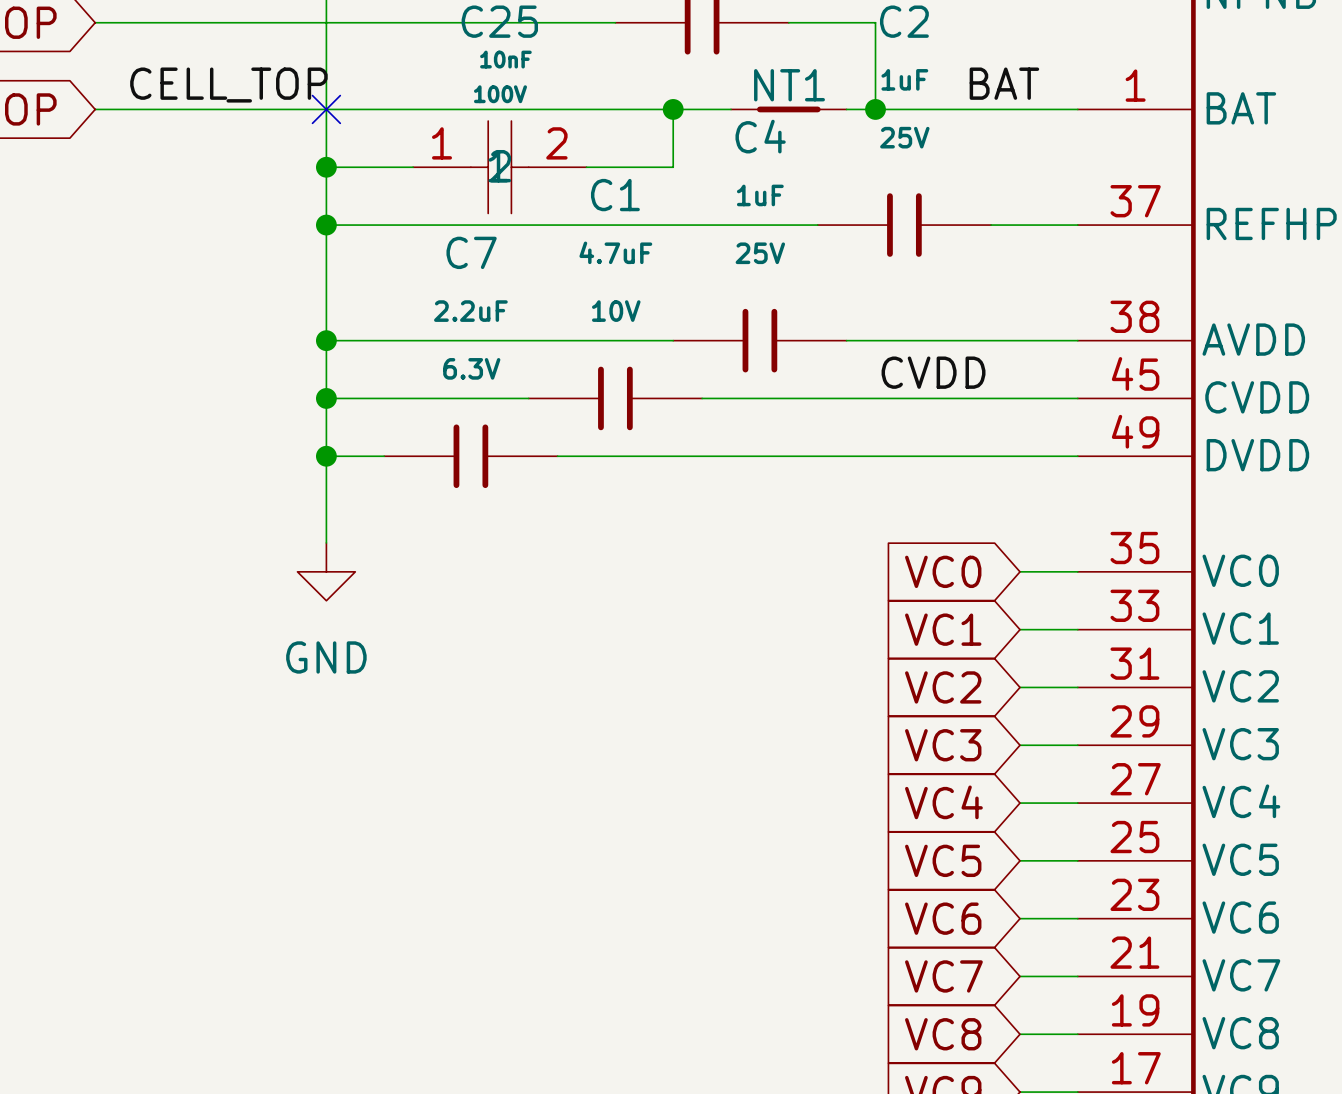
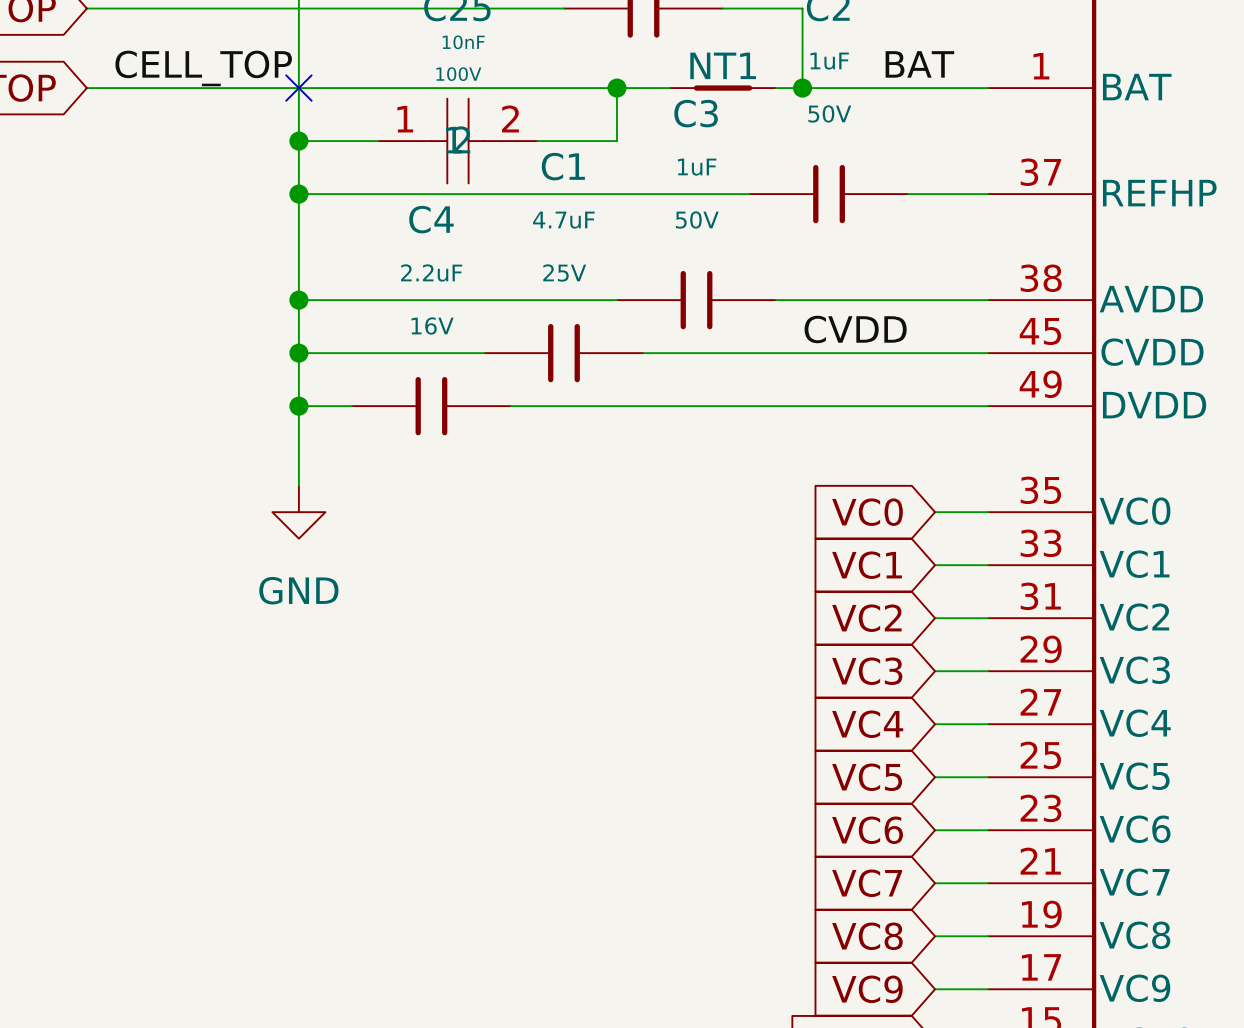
C4 name: C4 (760, 136) -> C3 (696, 113)
C2 text: 25V (904, 137) -> 50V (829, 113)
C7 name: C7 (471, 252) -> C4 (431, 219)
C4 text: 25V (760, 253) -> 50V (697, 219)
C1 text: 10V (616, 311) -> 25V (564, 272)
C7 text: 6.3V (471, 368) -> 16V (432, 326)

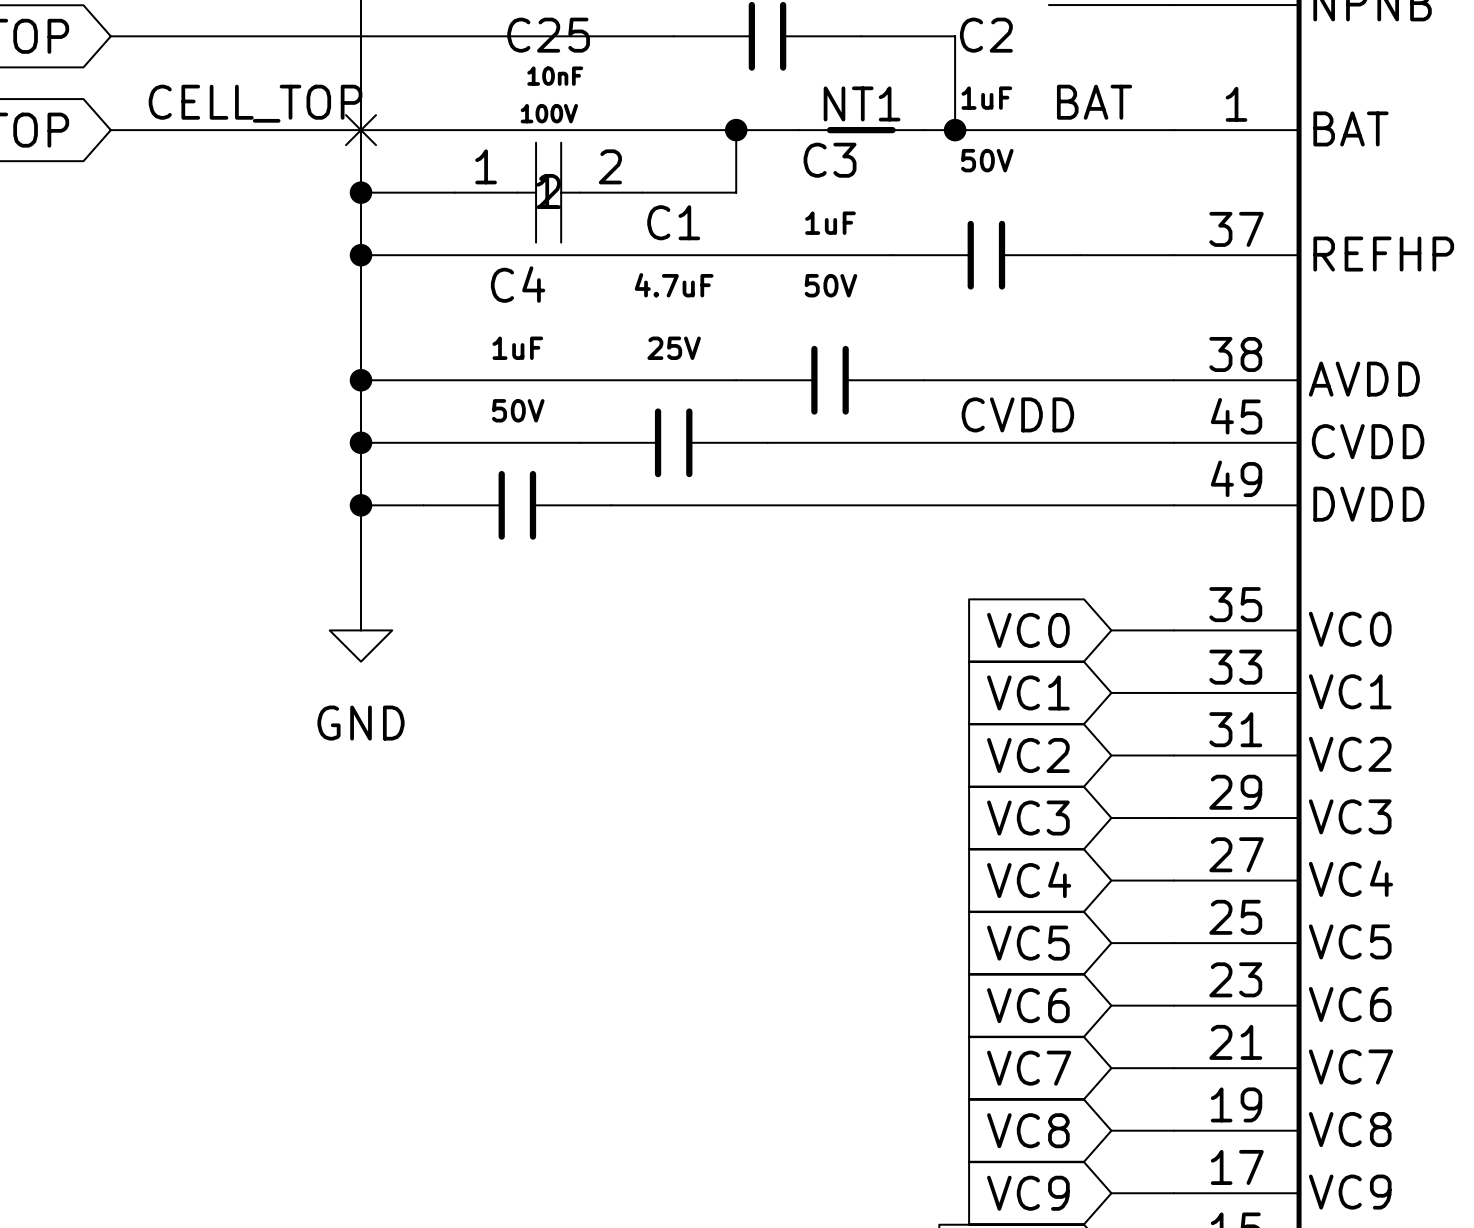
C4 value: 2.2uF (431, 272) -> 1uF (517, 348)
C4 text: 16V (432, 326) -> 50V (518, 410)

